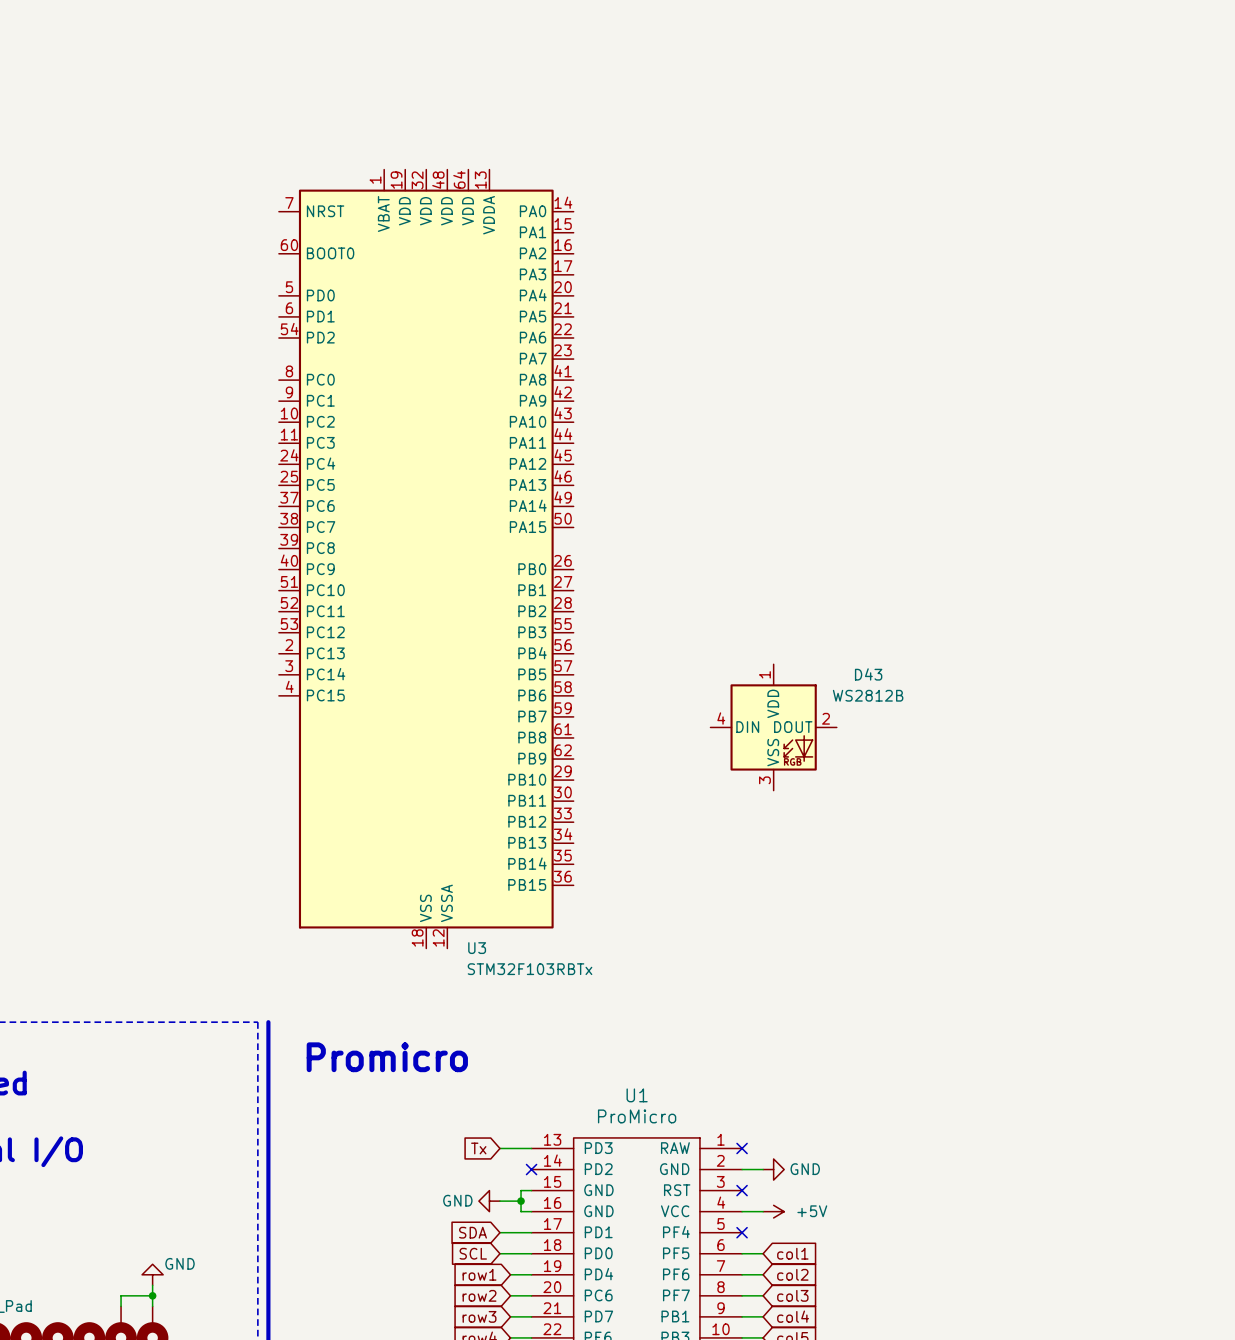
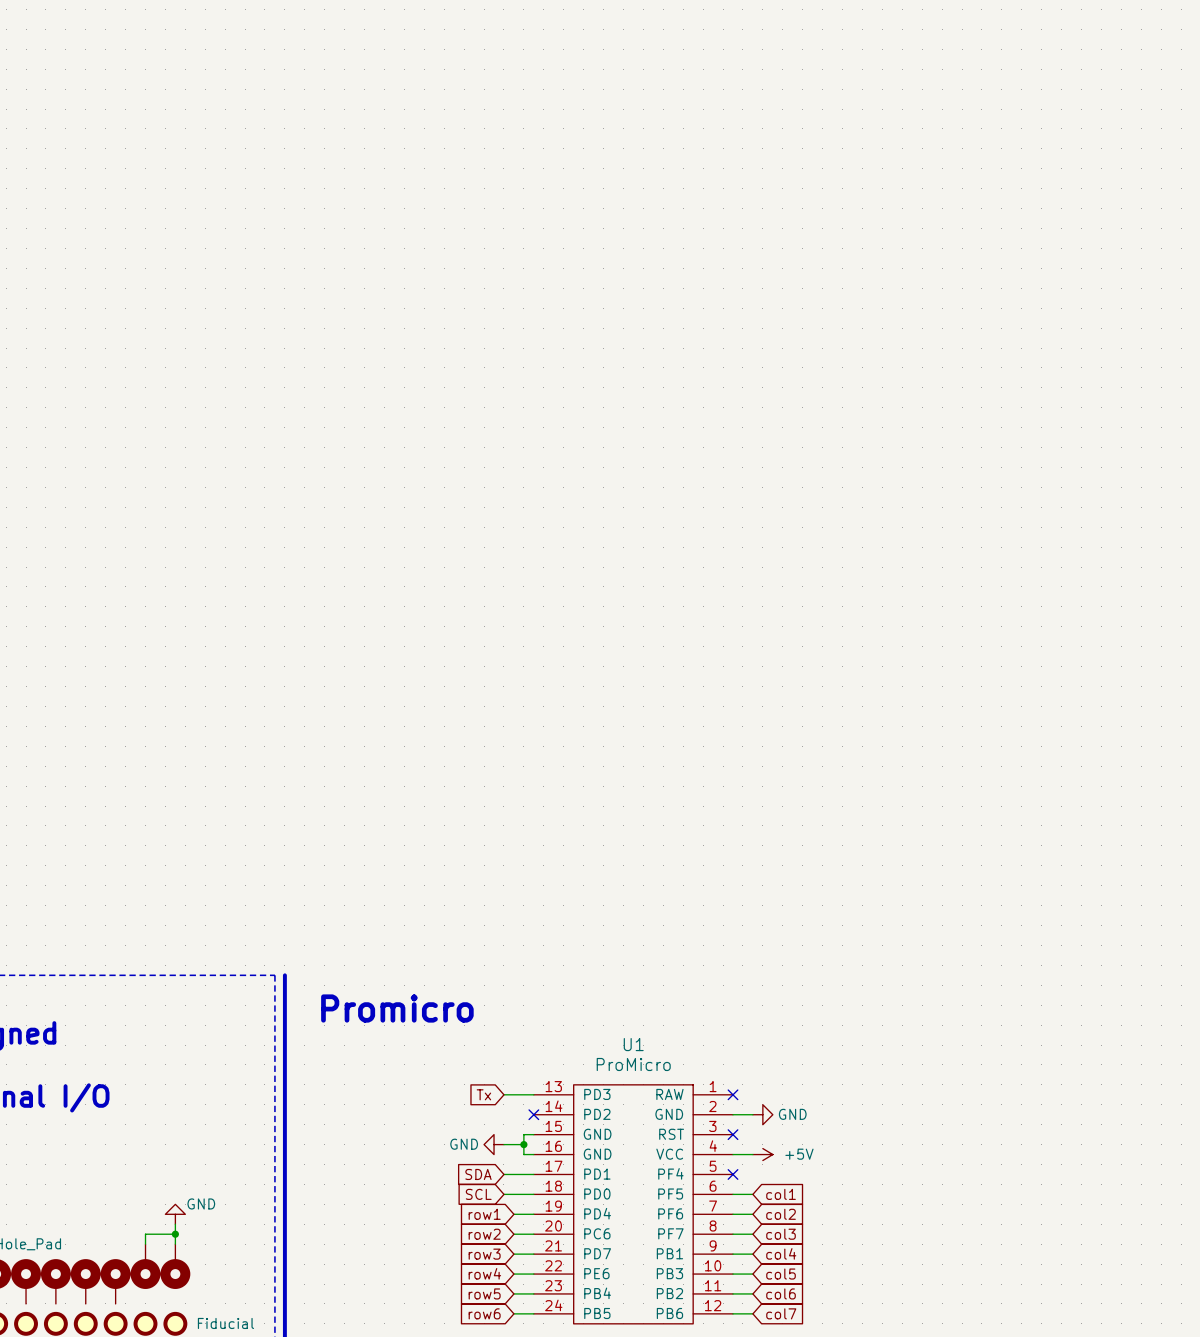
U3: STM32F103RBTx (426, 559) -> none
D43: WS2812B (773, 727) -> none

